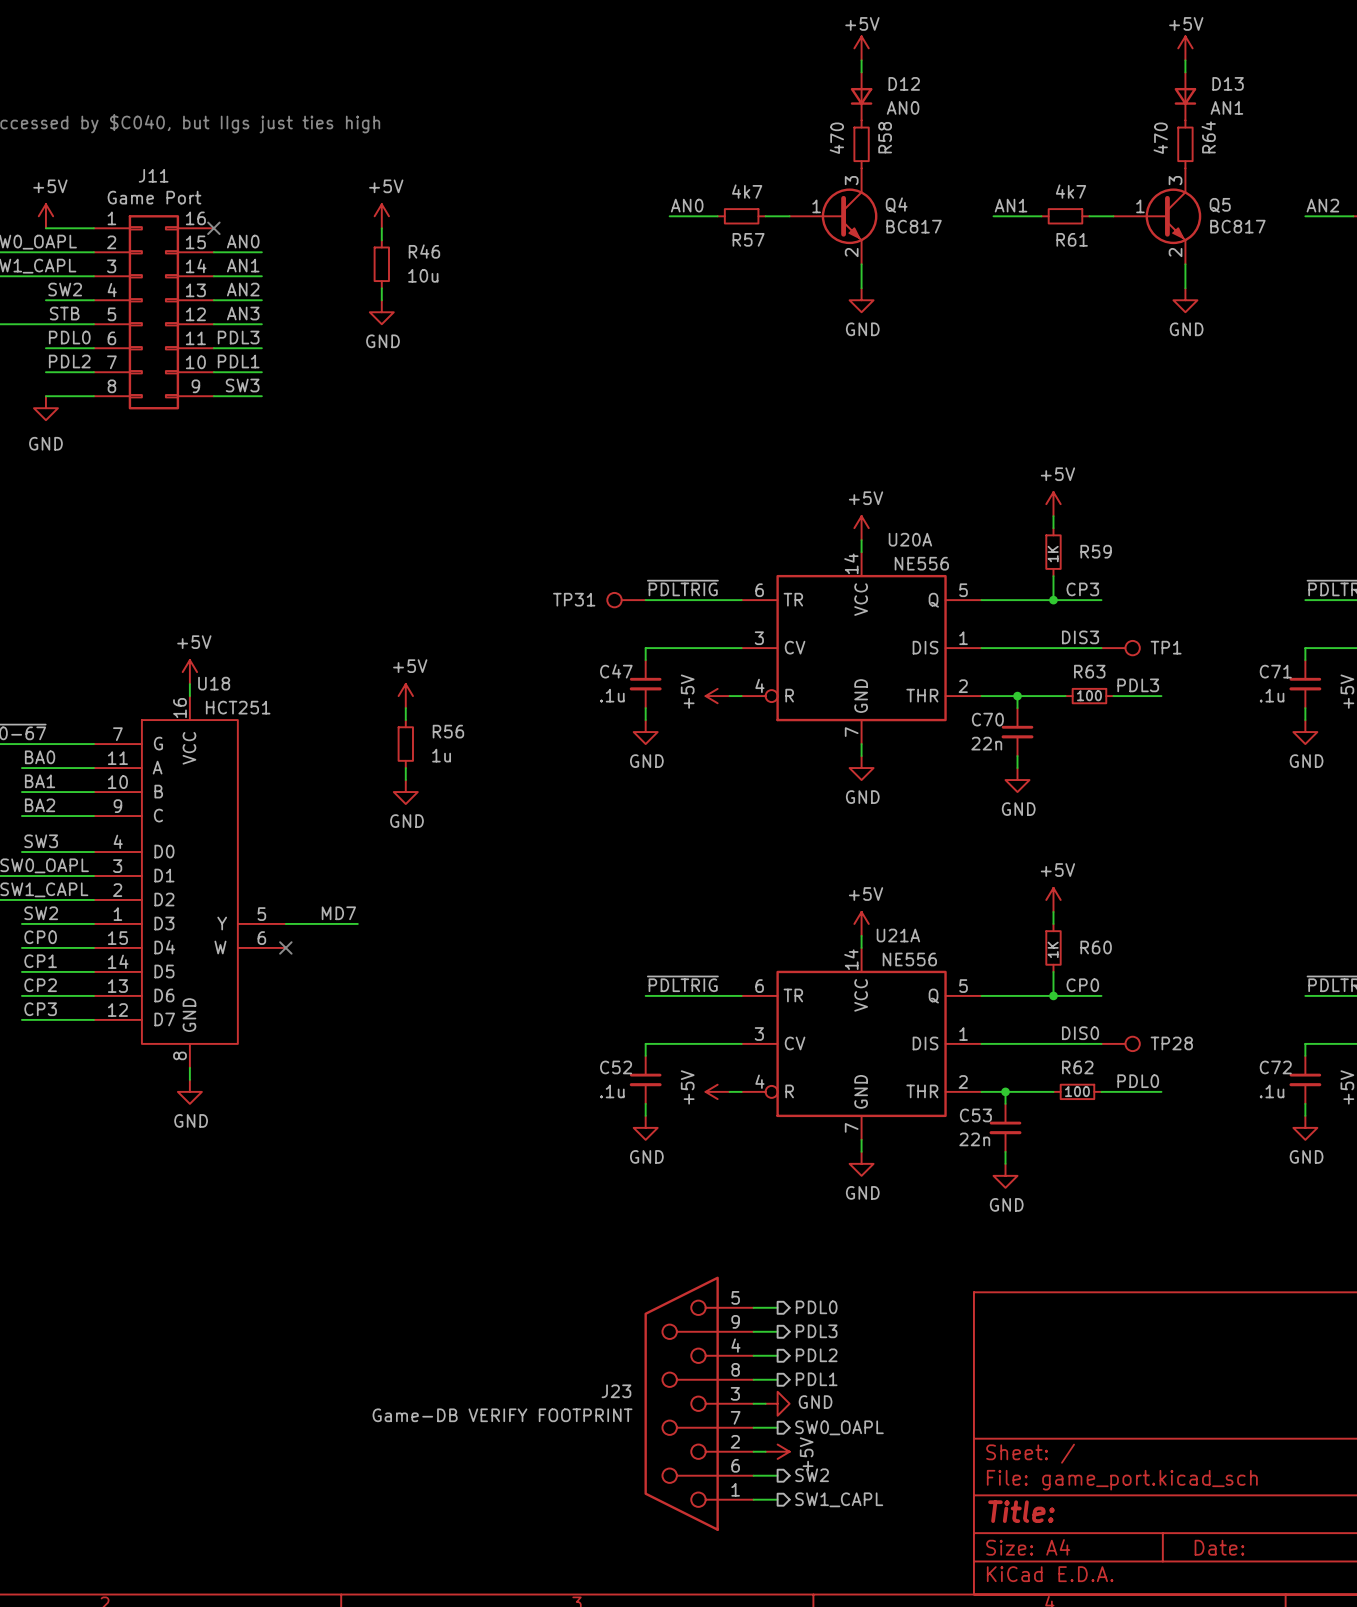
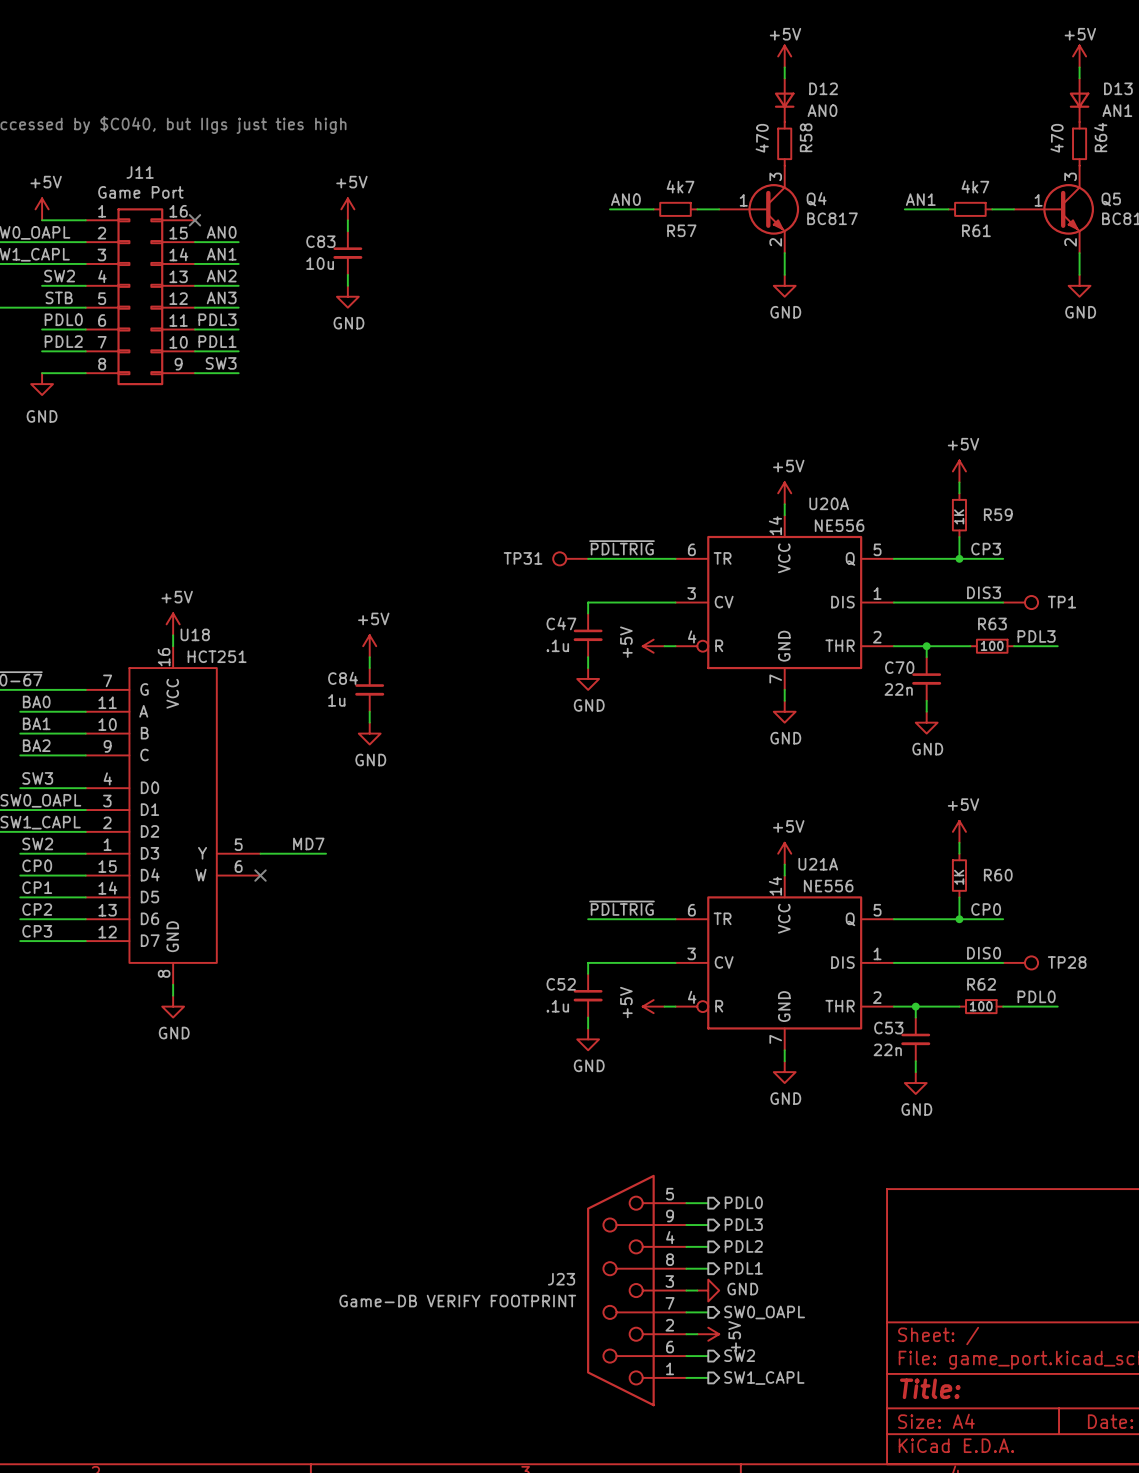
R46: 10u (381, 264) -> none
C83: none -> 10u (347, 253)
R56: 1u (405, 744) -> none
C84: none -> 1u (369, 689)

